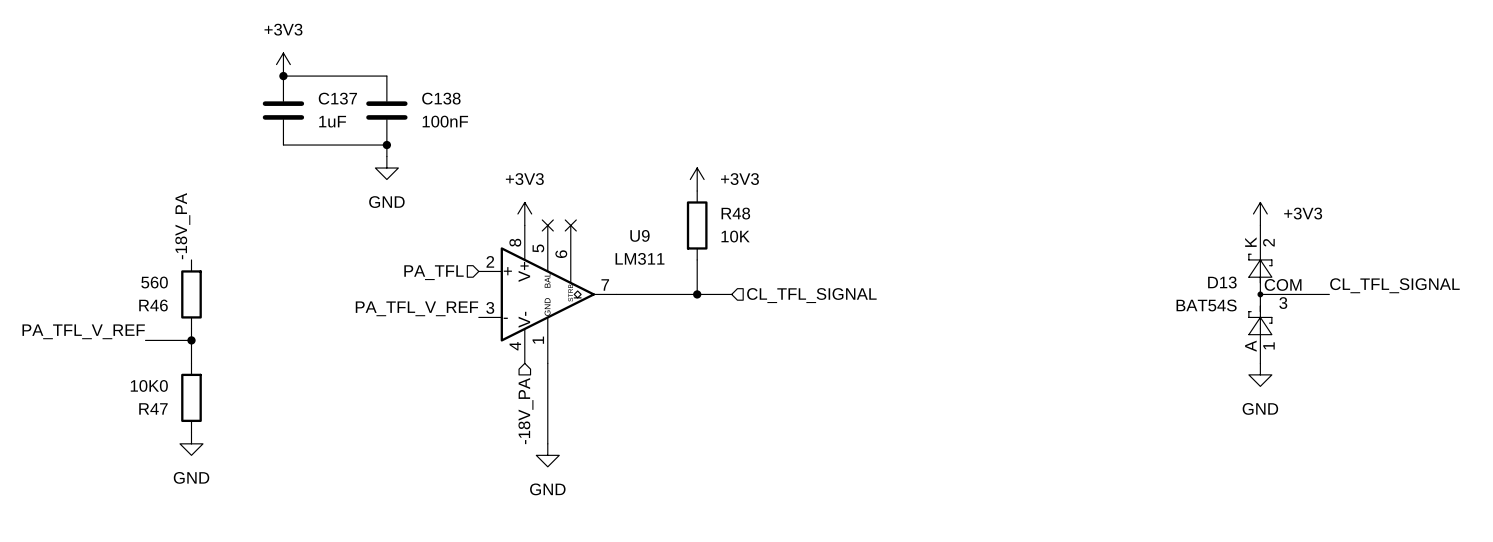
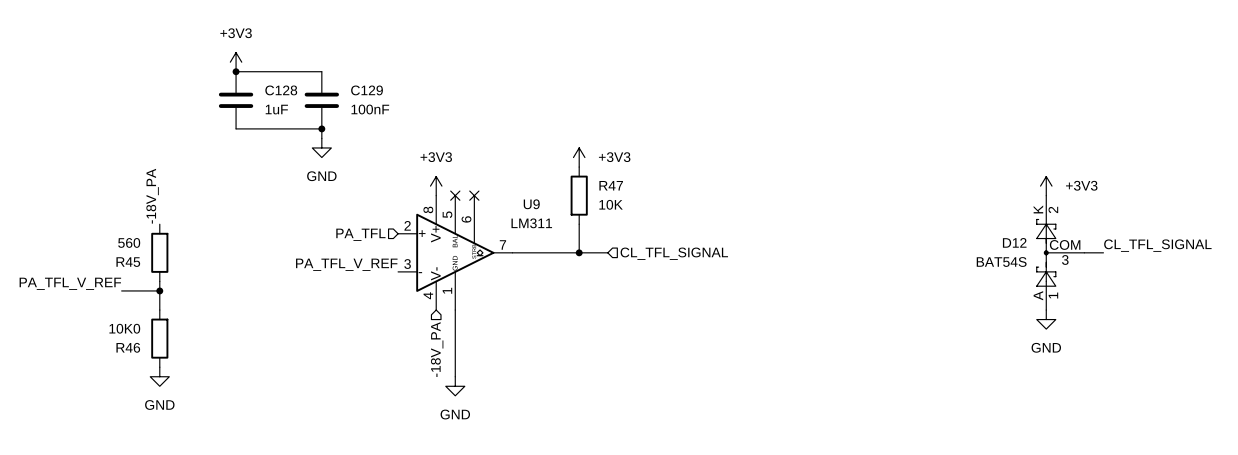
C137 name: C137 (337, 98) -> C128 (281, 90)
C138 name: C138 (441, 98) -> C129 (367, 90)
R48 name: R48 (735, 213) -> R47 (611, 185)
D13 name: D13 (1222, 282) -> D12 (1014, 242)
R46 name: R46 (153, 305) -> R45 (128, 262)
R47 name: R47 (153, 408) -> R46 (128, 347)

